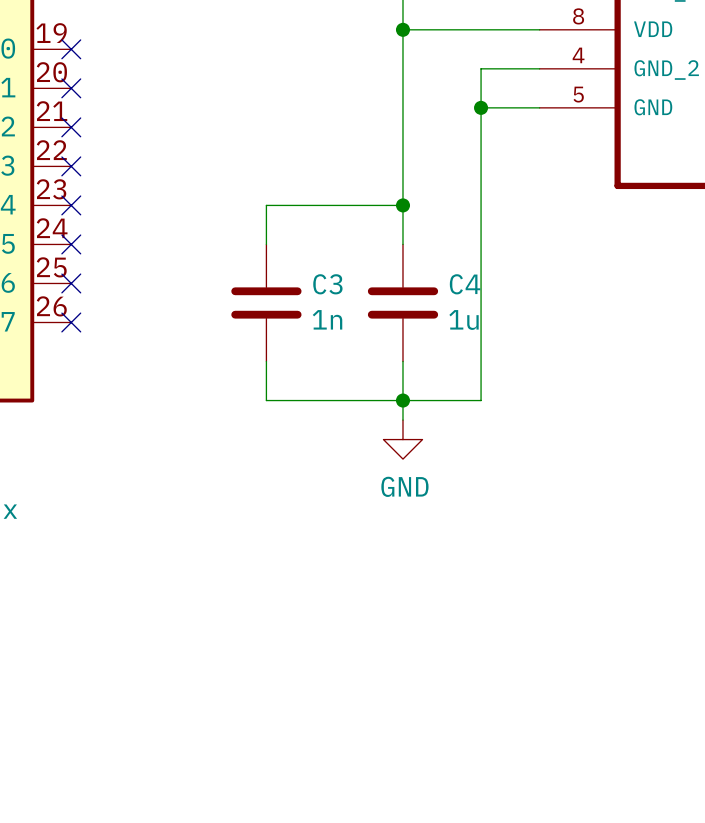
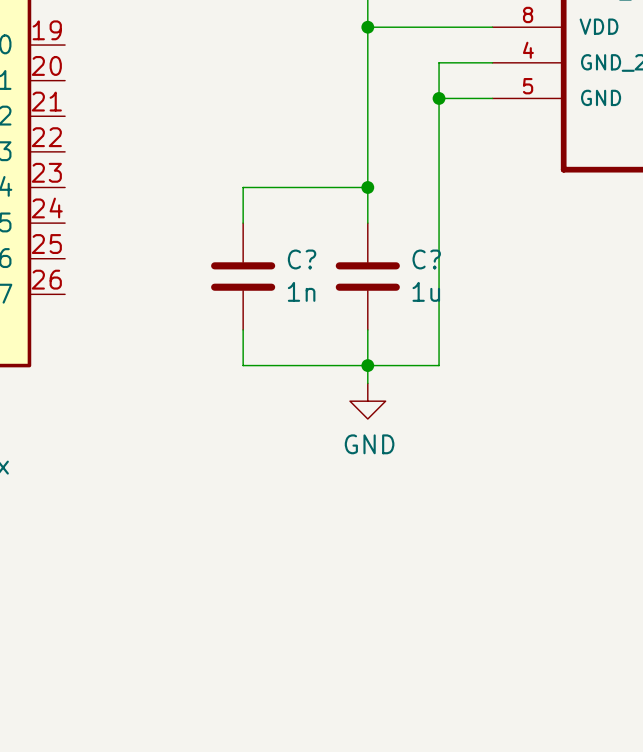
no-connect mark: (71, 49) -> none
no-connect mark: (71, 88) -> none
no-connect mark: (71, 127) -> none
no-connect mark: (71, 166) -> none
no-connect mark: (71, 205) -> none
no-connect mark: (71, 244) -> none
no-connect mark: (71, 283) -> none
C3 name: C3 (327, 284) -> C? (302, 259)
C4 name: C4 (465, 284) -> C? (426, 259)
no-connect mark: (71, 322) -> none

